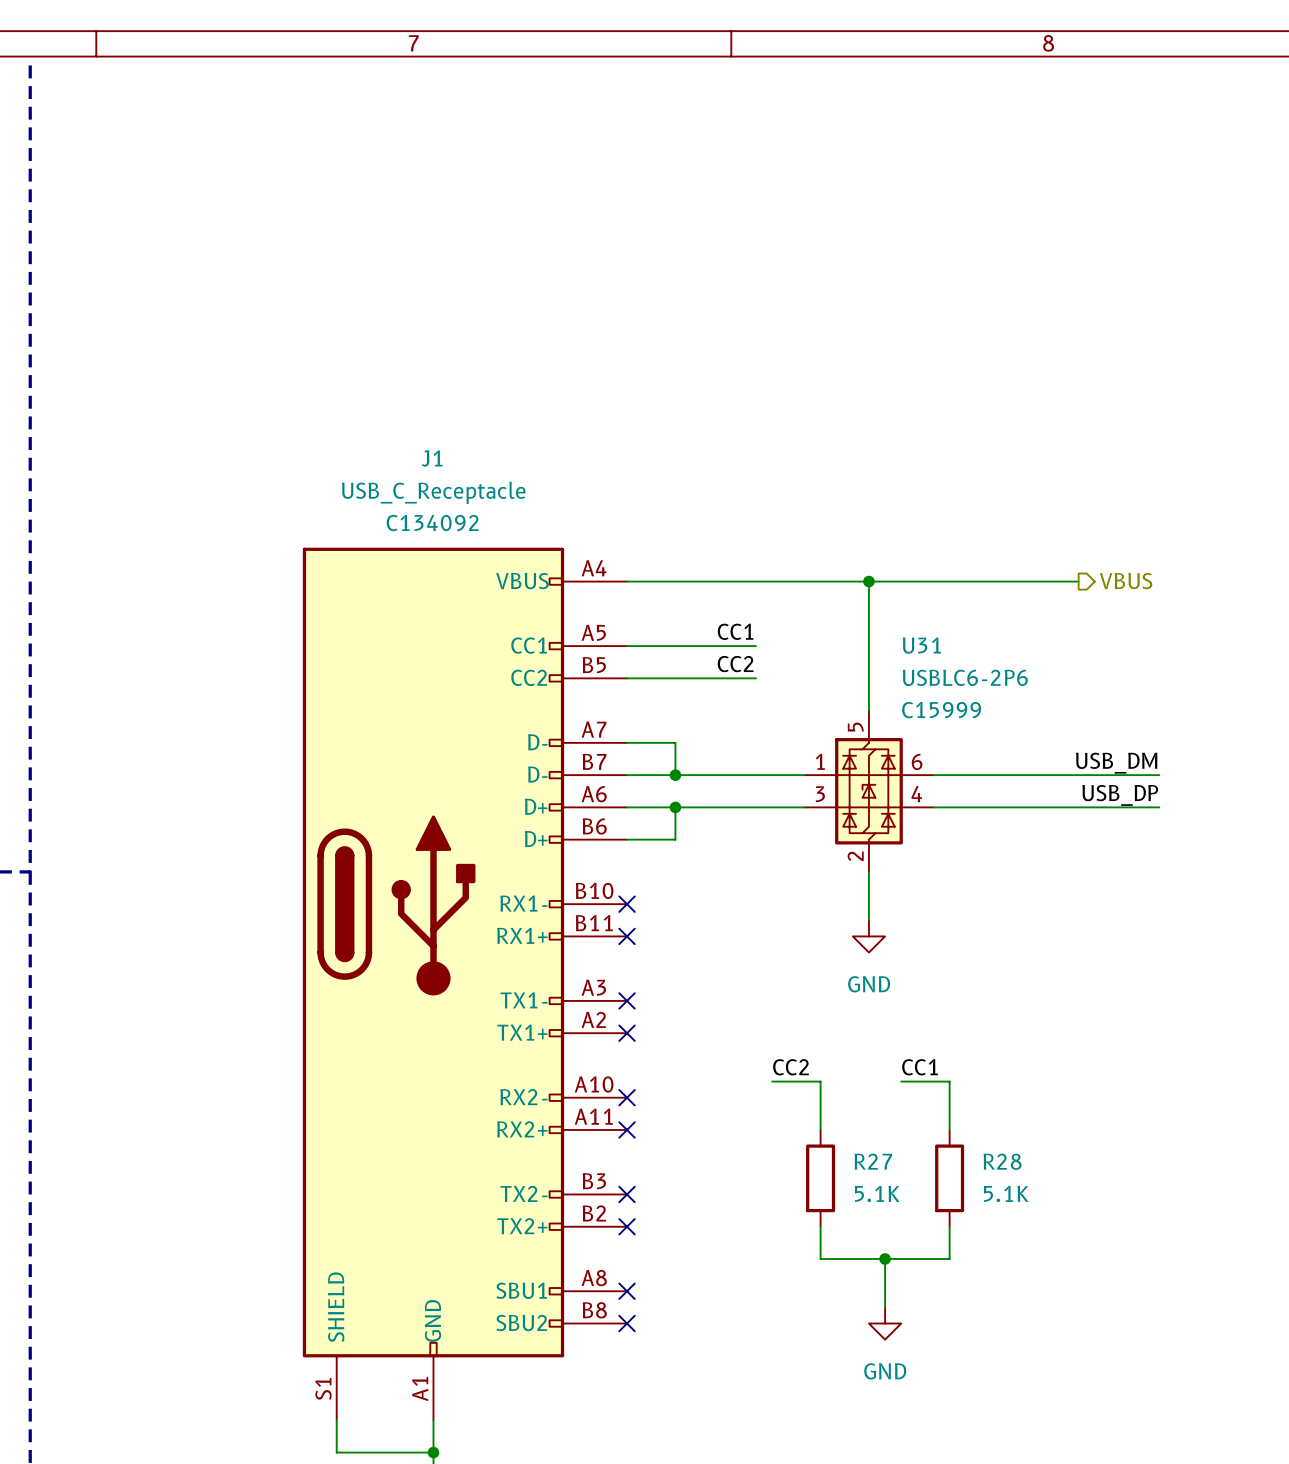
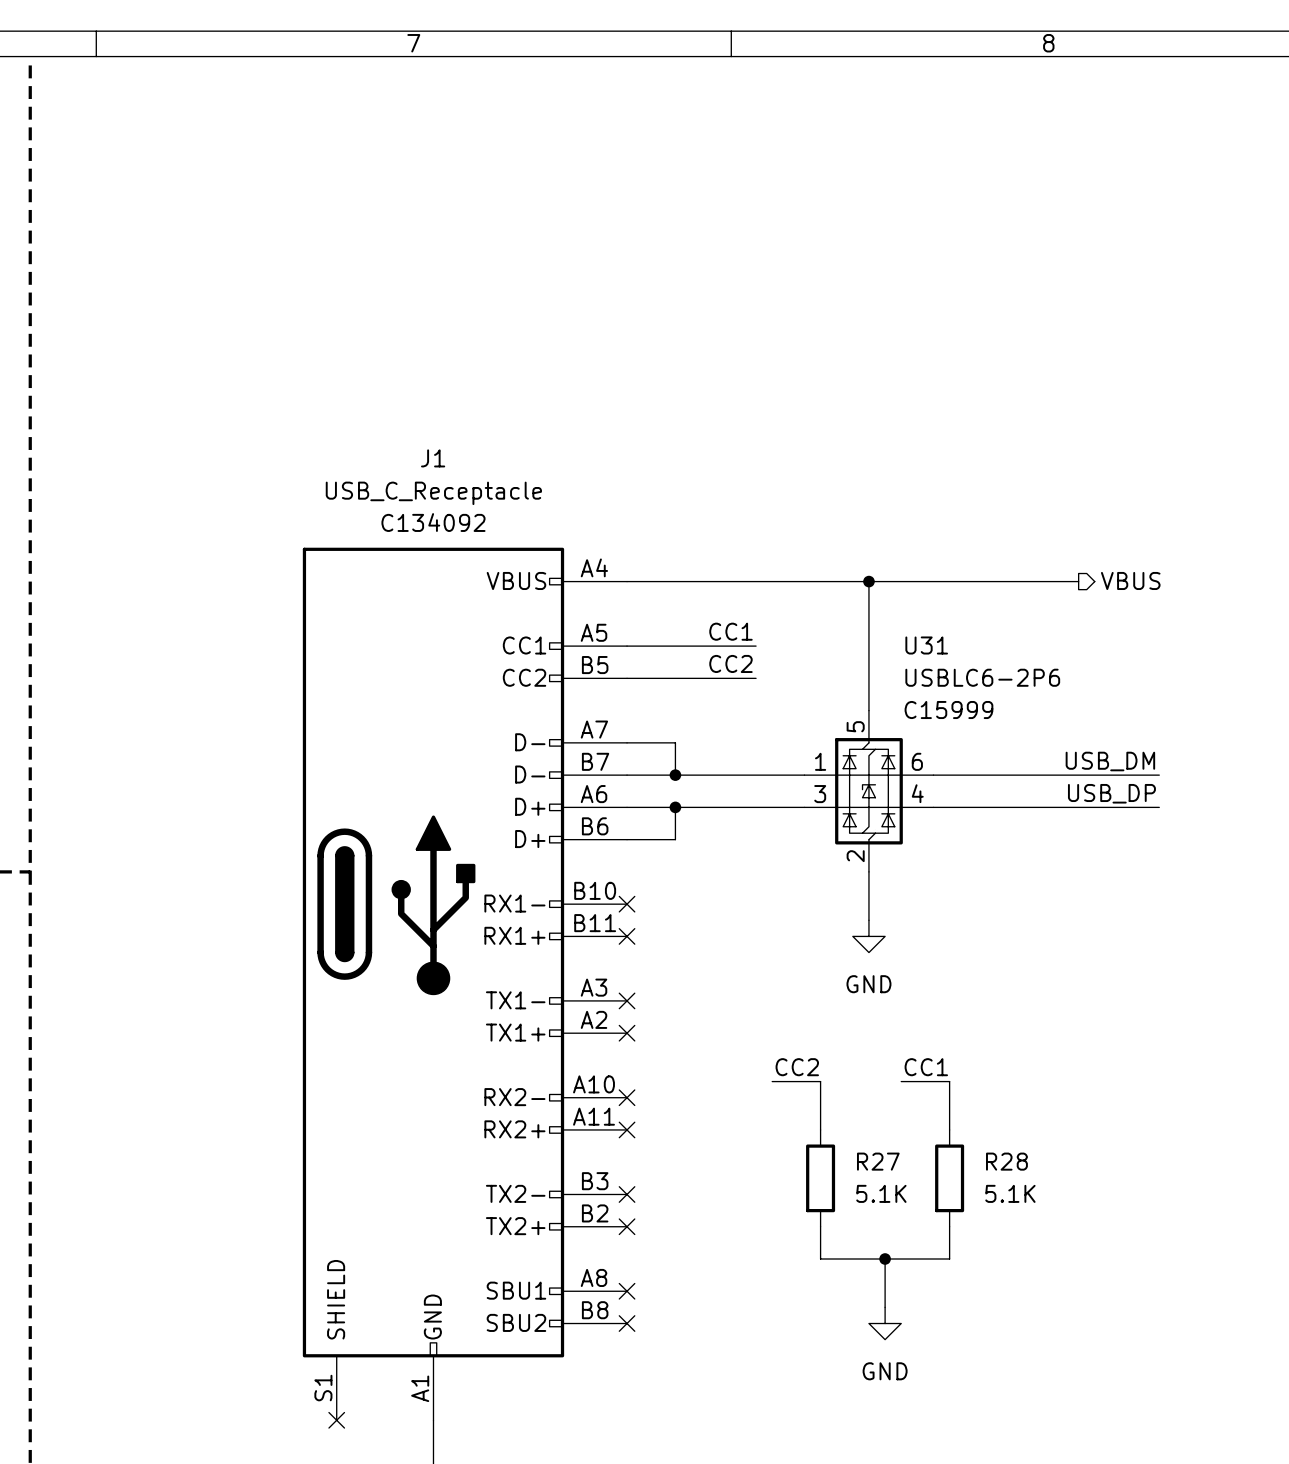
wire: (336, 1420) (336, 1452) (433, 1452) -> none
no-connect mark: none -> (336, 1420)
junction: (433, 1452) -> none

